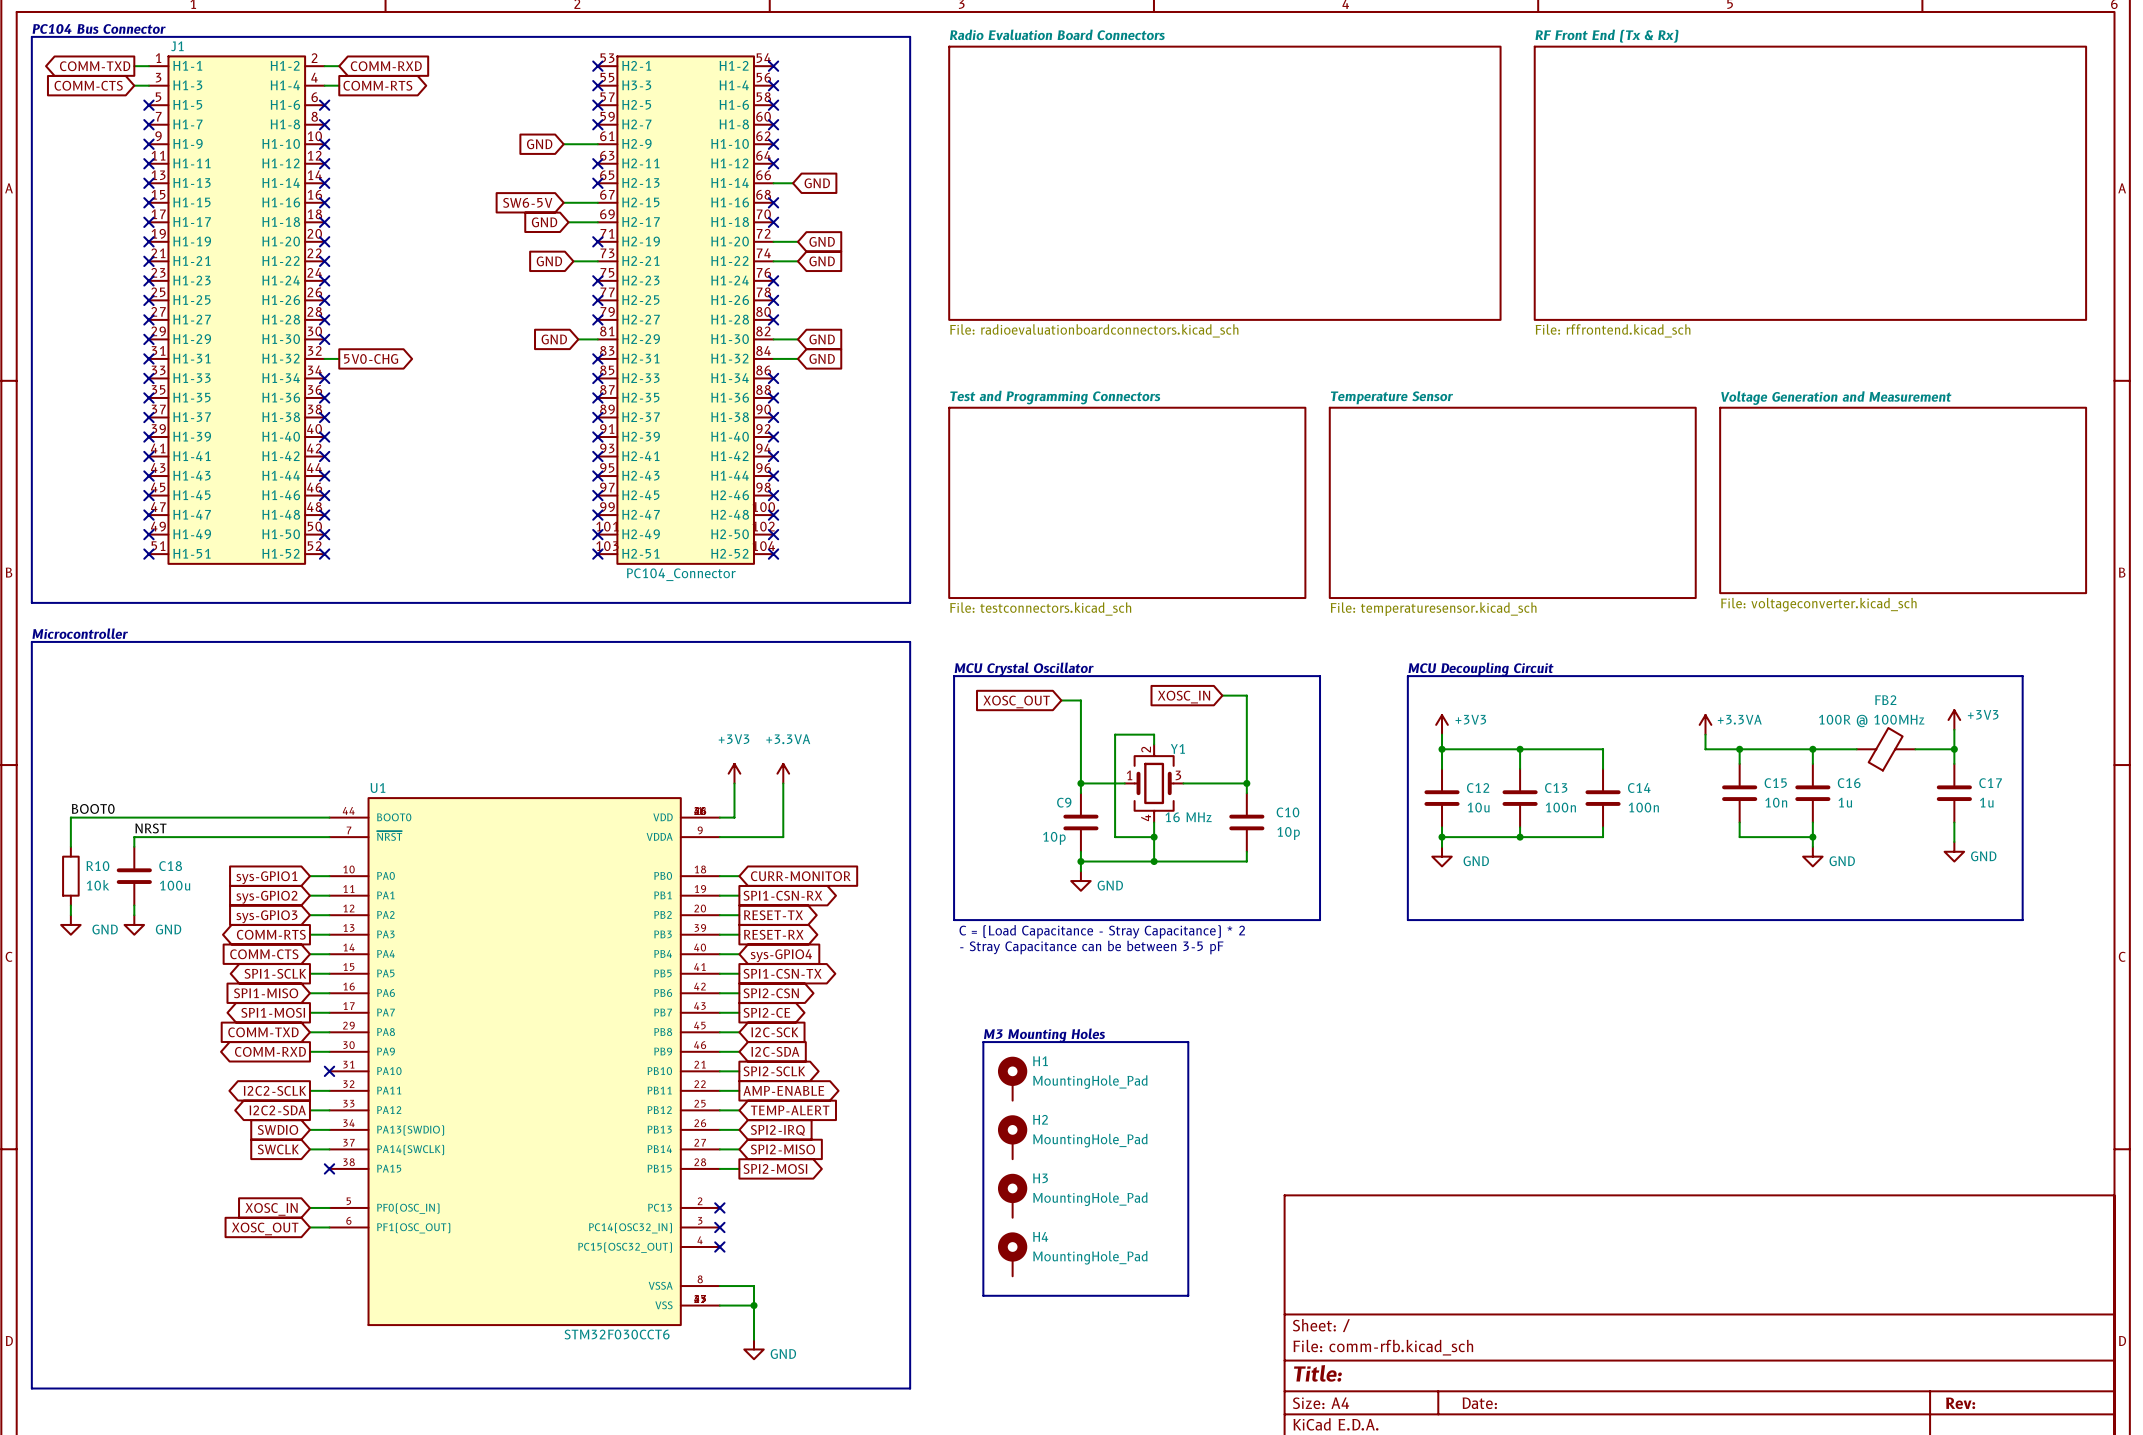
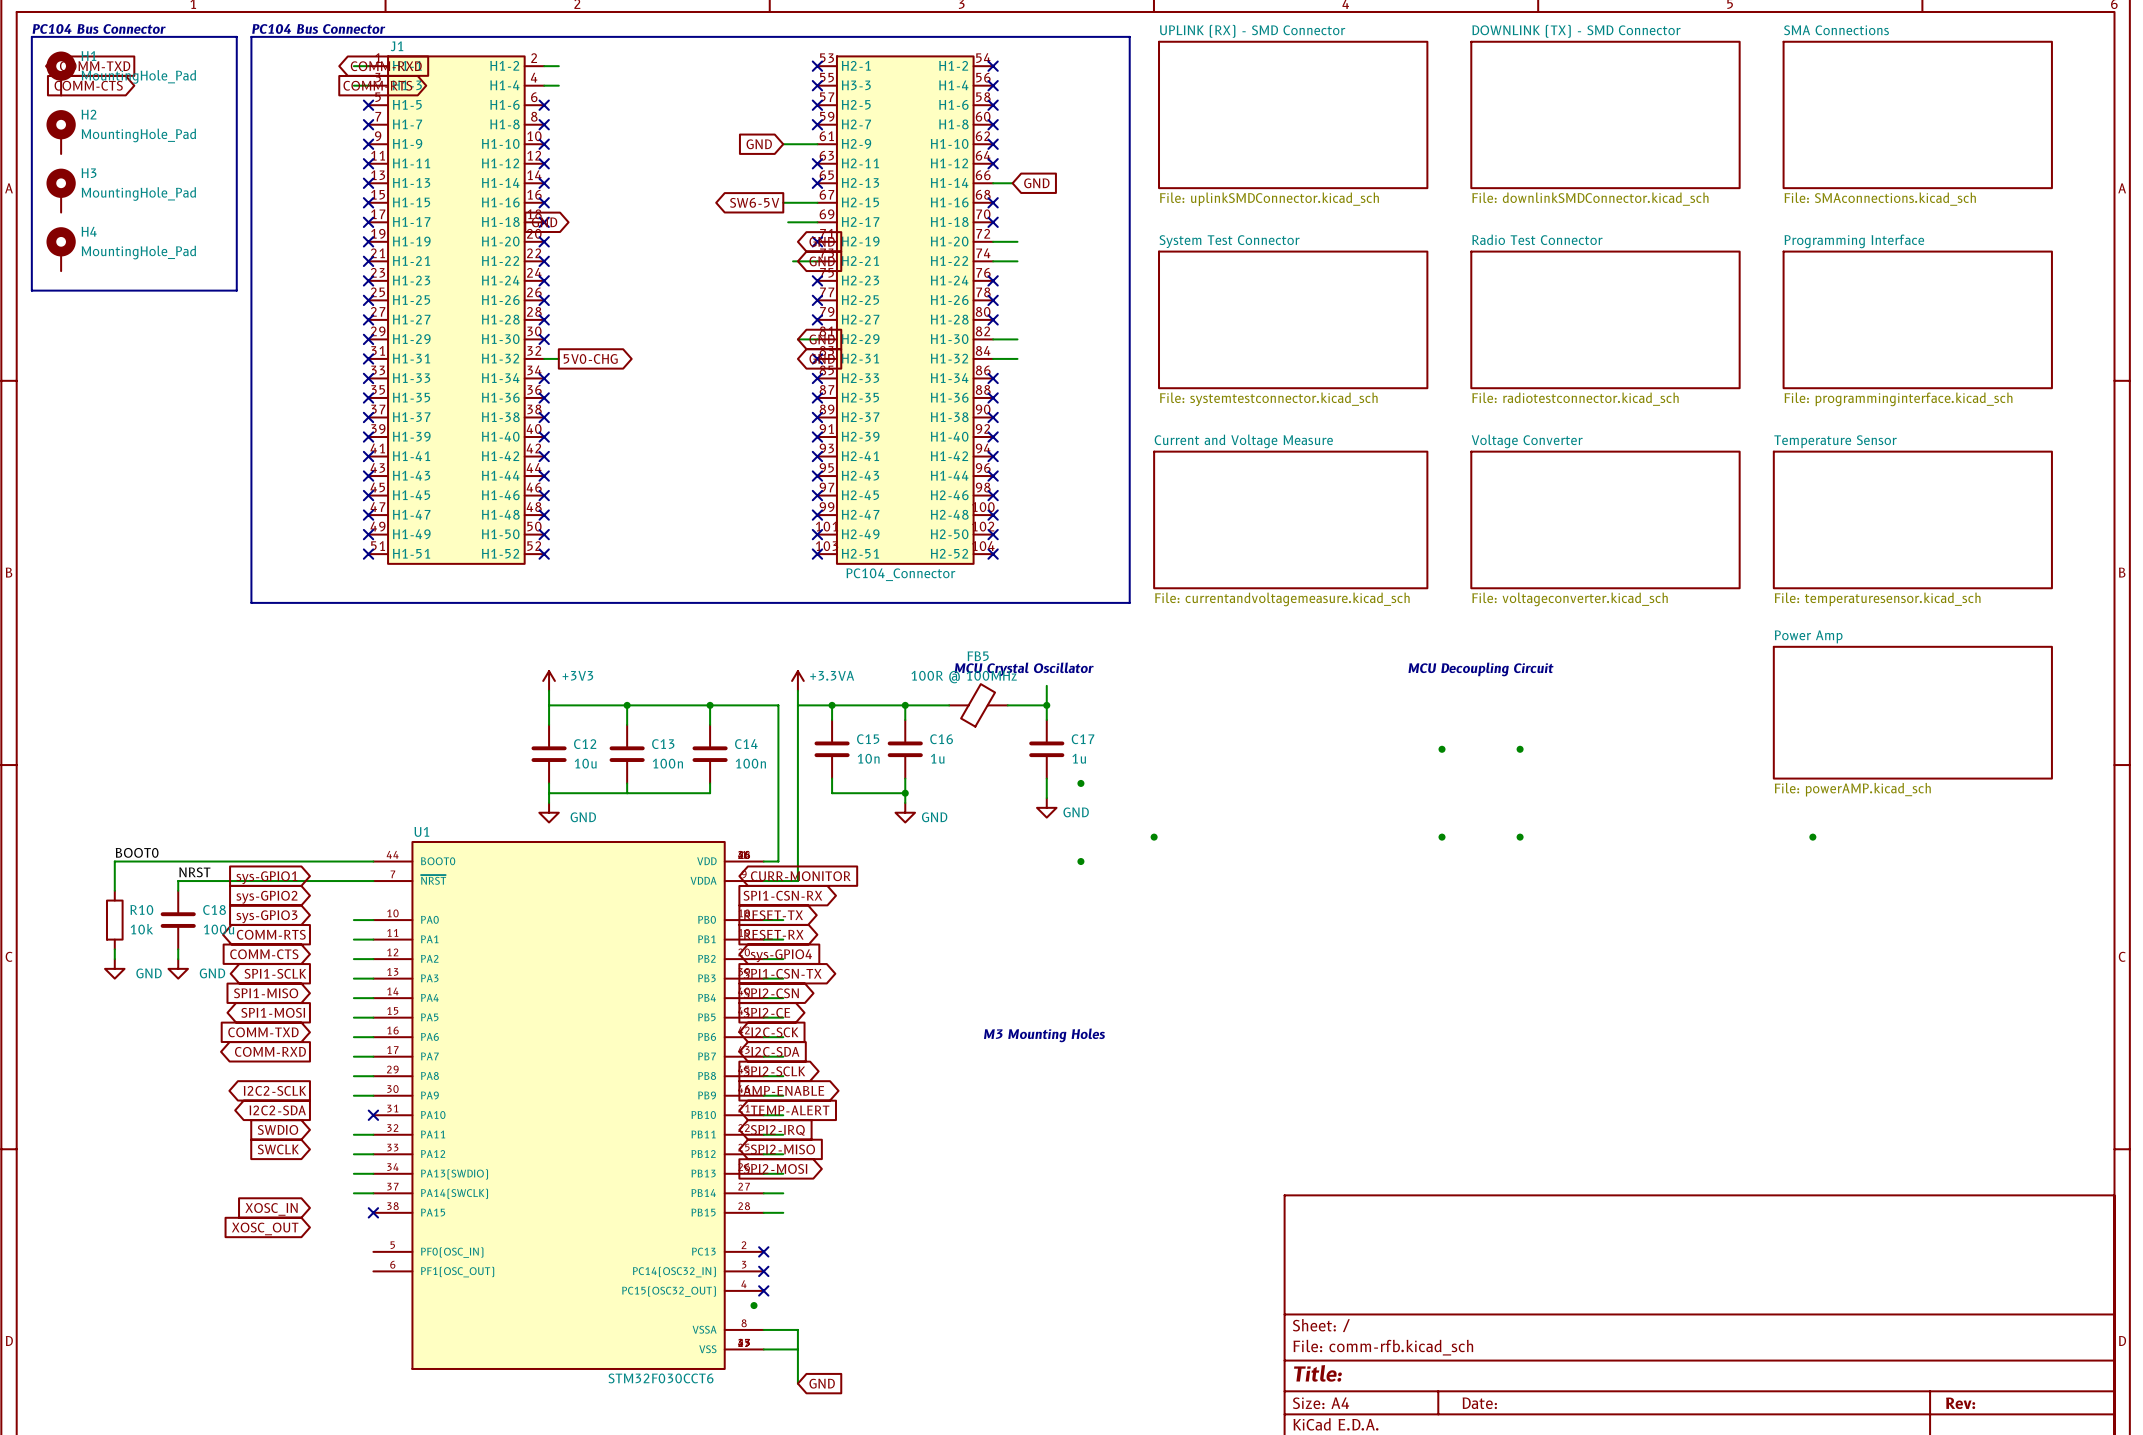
text: none -> PC104 Bus Connector (318, 28)
line: (236, 36) (251, 36) -> (236, 36) (236, 290) (31, 290)
line: (910, 36) (910, 602) -> (910, 36) (1129, 36) (1129, 602) (910, 602)
wire: (134, 66) (148, 66) -> none
wire: (324, 66) (339, 66) -> (353, 66) (368, 66)
wire: none -> (544, 66) (558, 66)
no-connect mark: (597, 66) -> none
no-connect mark: (773, 66) -> none
no-connect mark: none -> (817, 66)
no-connect mark: none -> (993, 66)
wire: (134, 85) (148, 85) -> none
wire: (324, 85) (339, 85) -> (353, 85) (368, 85)
wire: none -> (544, 85) (558, 85)
no-connect mark: (597, 85) -> none
no-connect mark: (773, 85) -> none
no-connect mark: none -> (817, 85)
no-connect mark: none -> (993, 85)
no-connect mark: (148, 105) -> none
no-connect mark: (324, 105) -> none
no-connect mark: none -> (368, 105)
no-connect mark: none -> (544, 105)
no-connect mark: (597, 105) -> none
no-connect mark: (773, 105) -> none
no-connect mark: none -> (817, 105)
no-connect mark: none -> (993, 105)
sheet UPLINK (RX) - SMD Connector: none -> File: uplinkSMDConnector.kicad_sch (1293, 114)
sheet DOWNLINK (TX) - SMD Connector: none -> File: downlinkSMDConnector.kicad_sch (1605, 114)
sheet SMA Connections: none -> File: SMAconnections.kicad_sch (1917, 114)
no-connect mark: (148, 124) -> none
no-connect mark: (324, 124) -> none
no-connect mark: none -> (368, 124)
no-connect mark: none -> (544, 124)
no-connect mark: (597, 124) -> none
no-connect mark: (773, 124) -> none
no-connect mark: none -> (817, 124)
no-connect mark: none -> (993, 124)
no-connect mark: (148, 144) -> none
no-connect mark: (324, 144) -> none
no-connect mark: none -> (368, 144)
global label: GND (539, 144) -> none
no-connect mark: none -> (544, 144)
wire: (563, 144) (597, 144) -> none
no-connect mark: (773, 144) -> none
wire: none -> (783, 144) (817, 144)
no-connect mark: none -> (993, 144)
no-connect mark: (148, 163) -> none
no-connect mark: (324, 163) -> none
no-connect mark: none -> (368, 163)
no-connect mark: none -> (544, 163)
no-connect mark: (597, 163) -> none
no-connect mark: (773, 163) -> none
no-connect mark: none -> (817, 163)
no-connect mark: none -> (993, 163)
no-connect mark: (148, 183) -> none
no-connect mark: (324, 183) -> none
no-connect mark: none -> (368, 183)
no-connect mark: none -> (544, 183)
no-connect mark: (597, 183) -> none
wire: (773, 183) (793, 183) -> (797, 261) (817, 261)
no-connect mark: none -> (817, 183)
global label rotation: 0° (817, 183) -> 180° (759, 144)
global label position: GND (817, 183) -> GND (759, 144)
wire: none -> (993, 183) (1012, 183)
global label: none -> GND (1036, 183)
sheet Radio Evaluation Board Connectors: File: radioevaluationboardconnectors.kicad_sch (1224, 183) -> none
sheet RF Front End (Tx & Rx): File: rffrontend.kicad_sch (1810, 183) -> none
no-connect mark: (148, 202) -> none
no-connect mark: (324, 202) -> none
no-connect mark: none -> (368, 202)
global label: SW6-5V (527, 202) -> none
no-connect mark: none -> (544, 202)
wire: (563, 202) (597, 202) -> none
global label: none -> SW6-5V (754, 202)
no-connect mark: (773, 202) -> none
wire: none -> (783, 202) (817, 202)
no-connect mark: none -> (993, 202)
no-connect mark: (148, 222) -> none
no-connect mark: (324, 222) -> none
no-connect mark: none -> (368, 222)
no-connect mark: none -> (544, 222)
wire: (568, 222) (597, 222) -> none
no-connect mark: (773, 222) -> none
wire: none -> (788, 222) (817, 222)
no-connect mark: none -> (993, 222)
no-connect mark: (148, 241) -> none
no-connect mark: (324, 241) -> none
no-connect mark: none -> (368, 241)
no-connect mark: none -> (544, 241)
no-connect mark: (597, 241) -> none
wire: (773, 241) (797, 241) -> none
no-connect mark: none -> (817, 241)
wire: none -> (993, 241) (1017, 241)
no-connect mark: (148, 261) -> none
no-connect mark: (324, 261) -> none
no-connect mark: none -> (368, 261)
no-connect mark: none -> (544, 261)
global label: GND (549, 261) -> none
wire: (573, 261) (597, 261) -> none
wire: (773, 261) (793, 261) -> none
wire: none -> (993, 261) (1017, 261)
no-connect mark: (148, 280) -> none
no-connect mark: (324, 280) -> none
no-connect mark: none -> (368, 280)
no-connect mark: none -> (544, 280)
no-connect mark: (597, 280) -> none
no-connect mark: (773, 280) -> none
no-connect mark: none -> (817, 280)
no-connect mark: none -> (993, 280)
line: (31, 290) (31, 602) (251, 602) -> (251, 36) (251, 602)
no-connect mark: (148, 300) -> none
no-connect mark: (324, 300) -> none
no-connect mark: none -> (368, 300)
no-connect mark: none -> (544, 300)
no-connect mark: (597, 300) -> none
no-connect mark: (773, 300) -> none
no-connect mark: none -> (817, 300)
no-connect mark: none -> (993, 300)
J1 position: (461, 310) -> (680, 310)
no-connect mark: (148, 319) -> none
no-connect mark: (324, 319) -> none
no-connect mark: none -> (368, 319)
no-connect mark: none -> (544, 319)
no-connect mark: (597, 319) -> none
no-connect mark: (773, 319) -> none
no-connect mark: none -> (817, 319)
no-connect mark: none -> (993, 319)
sheet System Test Connector: none -> File: systemtestconnector.kicad_sch (1293, 319)
sheet Radio Test Connector: none -> File: radiotestconnector.kicad_sch (1605, 319)
sheet Programming Interface: none -> File: programminginterface.kicad_sch (1917, 319)
no-connect mark: (148, 339) -> none
no-connect mark: (324, 339) -> none
no-connect mark: none -> (368, 339)
no-connect mark: none -> (544, 339)
global label: GND (554, 339) -> none
wire: (578, 339) (597, 339) -> none
wire: (773, 339) (797, 339) -> (817, 339) (797, 339)
wire: none -> (993, 339) (1017, 339)
no-connect mark: (148, 358) -> none
wire: (324, 358) (339, 358) -> none
no-connect mark: none -> (368, 358)
global label: 5V0-CHG (371, 358) -> none
wire: none -> (544, 358) (558, 358)
global label: none -> 5V0-CHG (590, 358)
no-connect mark: (597, 358) -> none
wire: (773, 358) (797, 358) -> none
no-connect mark: none -> (817, 358)
wire: none -> (993, 358) (1017, 358)
no-connect mark: (148, 378) -> none
no-connect mark: (324, 378) -> none
no-connect mark: none -> (368, 378)
no-connect mark: none -> (544, 378)
no-connect mark: (597, 378) -> none
no-connect mark: (773, 378) -> none
no-connect mark: none -> (817, 378)
no-connect mark: none -> (993, 378)
no-connect mark: (148, 397) -> none
no-connect mark: (324, 397) -> none
no-connect mark: none -> (368, 397)
no-connect mark: none -> (544, 397)
no-connect mark: (597, 397) -> none
no-connect mark: (773, 397) -> none
no-connect mark: none -> (817, 397)
no-connect mark: none -> (993, 397)
no-connect mark: (148, 417) -> none
no-connect mark: (324, 417) -> none
no-connect mark: none -> (368, 417)
no-connect mark: none -> (544, 417)
no-connect mark: (597, 417) -> none
no-connect mark: (773, 417) -> none
no-connect mark: none -> (817, 417)
no-connect mark: none -> (993, 417)
no-connect mark: (148, 437) -> none
no-connect mark: (324, 437) -> none
no-connect mark: none -> (368, 437)
no-connect mark: none -> (544, 437)
no-connect mark: (597, 437) -> none
no-connect mark: (773, 437) -> none
no-connect mark: none -> (817, 437)
no-connect mark: none -> (993, 437)
no-connect mark: (148, 456) -> none
no-connect mark: (324, 456) -> none
no-connect mark: none -> (368, 456)
no-connect mark: none -> (544, 456)
no-connect mark: (597, 456) -> none
no-connect mark: (773, 456) -> none
no-connect mark: none -> (817, 456)
no-connect mark: none -> (993, 456)
no-connect mark: (148, 476) -> none
no-connect mark: (324, 476) -> none
no-connect mark: none -> (368, 476)
no-connect mark: none -> (544, 476)
no-connect mark: (597, 476) -> none
no-connect mark: (773, 476) -> none
no-connect mark: none -> (817, 476)
no-connect mark: none -> (993, 476)
no-connect mark: (148, 495) -> none
no-connect mark: (324, 495) -> none
no-connect mark: none -> (368, 495)
no-connect mark: none -> (544, 495)
no-connect mark: (597, 495) -> none
no-connect mark: (773, 495) -> none
no-connect mark: none -> (817, 495)
no-connect mark: none -> (993, 495)
sheet Voltage Generation and Measurement: File: voltageconverter.kicad_sch (1903, 500) -> none
sheet Test and Programming Connectors: File: testconnectors.kicad_sch (1127, 502) -> none
sheet Temperature Sensor: File: temperaturesensor.kicad_sch (1512, 502) -> none
no-connect mark: (148, 515) -> none
no-connect mark: (324, 515) -> none
no-connect mark: none -> (368, 515)
no-connect mark: none -> (544, 515)
no-connect mark: (597, 515) -> none
no-connect mark: (773, 515) -> none
no-connect mark: none -> (817, 515)
no-connect mark: none -> (993, 515)
sheet Current and Voltage Measure: none -> File: currentandvoltagemeasure.kicad_sch (1290, 519)
sheet Voltage Converter: none -> File: voltageconverter.kicad_sch (1605, 519)
sheet Temperature Sensor: none -> File: temperaturesensor.kicad_sch (1912, 519)
no-connect mark: (148, 534) -> none
no-connect mark: (324, 534) -> none
no-connect mark: none -> (368, 534)
no-connect mark: none -> (544, 534)
no-connect mark: (597, 534) -> none
no-connect mark: (773, 534) -> none
no-connect mark: none -> (817, 534)
no-connect mark: none -> (993, 534)
no-connect mark: (148, 554) -> none
no-connect mark: (324, 554) -> none
no-connect mark: none -> (368, 554)
no-connect mark: none -> (544, 554)
no-connect mark: (597, 554) -> none
no-connect mark: (773, 554) -> none
no-connect mark: none -> (817, 554)
no-connect mark: none -> (993, 554)
text: Microcontroller (80, 633) -> none
line: (31, 641) (31, 1388) (910, 1388) (910, 641) (31, 641) -> none
line: (954, 676) (1320, 676) (1320, 920) (954, 920) (954, 676) -> none
line: (1407, 676) (1407, 920) (2022, 920) (2022, 676) (1407, 676) -> none
power symbol: none -> +3V3 (549, 680)
wire: none -> (1046, 685) (1046, 720)
wire: none -> (549, 690) (549, 724)
wire: none -> (797, 690) (797, 881) (763, 881)
wire: (1222, 695) (1246, 695) (1246, 793) -> none
global label: XOSC_IN (1184, 697) -> none
wire: (1061, 700) (1080, 700) (1080, 793) -> none
global label: XOSC_OUT (1016, 701) -> none
wire: none -> (549, 705) (778, 705) (778, 861) (763, 861)
wire: none -> (627, 705) (627, 724)
junction: none -> (627, 705)
wire: none -> (710, 705) (710, 724)
junction: none -> (710, 705)
wire: none -> (797, 705) (949, 705)
wire: none -> (832, 705) (832, 720)
junction: none -> (832, 705)
wire: none -> (905, 705) (905, 720)
junction: none -> (905, 705)
FB5: none -> 100R @ 100MHz (978, 705)
wire: none -> (1007, 705) (1046, 705)
junction: none -> (1046, 705)
sheet Power Amp: none -> File: powerAMP.kicad_sch (1912, 712)
power symbol: +3V3 (1954, 720) -> none
power symbol: +3V3 (1442, 724) -> none
power symbol: +3.3VA (1705, 724) -> none
wire: (1954, 729) (1954, 763) -> none
wire: (1442, 734) (1442, 768) -> none
wire: (1705, 734) (1705, 749) (1856, 749) -> none
power symbol text position: +3.3VA (788, 739) -> +3.3VA (832, 675)
wire: (1154, 744) (1154, 734) (1115, 734) (1115, 837) (1154, 837) -> none
wire: (1442, 749) (1603, 749) (1603, 768) -> none
wire: (1520, 749) (1520, 768) -> none
wire: (1739, 749) (1739, 763) -> none
junction: (1739, 749) -> none
wire: (1812, 749) (1812, 763) -> none
junction: (1812, 749) -> none
FB2: 100R @ 100MHz (1886, 749) -> none
wire: (1915, 749) (1954, 749) -> none
junction: (1954, 749) -> none
power symbol: +3V3 (734, 773) -> none
power symbol position: +3.3VA (783, 773) -> +3.3VA (797, 680)
wire: none -> (832, 778) (832, 793) (905, 793)
wire: none -> (905, 778) (905, 802)
wire: none -> (549, 783) (549, 802)
wire: none -> (627, 783) (627, 793)
wire: none -> (710, 783) (710, 793) (549, 793)
wire: (734, 783) (734, 817) (719, 817) -> none
wire: (783, 783) (783, 837) (719, 837) -> none
wire: (1080, 783) (1124, 783) -> none
Y1: 16 MHz (1154, 783) -> none
wire: (1183, 783) (1246, 783) -> none
junction: (1246, 783) -> none
junction: none -> (905, 793)
C15 position: (1739, 793) -> (832, 749)
C16 position: (1812, 793) -> (905, 749)
C17 position: (1954, 793) -> (1046, 749)
C12 position: (1442, 798) -> (549, 754)
C13 position: (1520, 798) -> (627, 754)
C14 position: (1603, 798) -> (710, 754)
label position: BOOT0 (93, 808) -> BOOT0 (137, 852)
power symbol: none -> GND (549, 812)
power symbol: none -> GND (905, 812)
wire: (329, 817) (70, 817) (70, 846) -> (373, 861) (114, 861) (114, 890)
C9: 10p (1080, 822) -> none
wire: (1154, 822) (1154, 861) -> none
C10: 10p (1246, 822) -> none
wire: (1739, 822) (1739, 837) (1812, 837) -> none
wire: (1812, 822) (1812, 846) -> none
wire: (1954, 822) (1954, 842) -> none
wire: (1442, 827) (1442, 846) -> none
wire: (1520, 827) (1520, 837) -> none
wire: (1603, 827) (1603, 837) (1442, 837) -> none
label position: NRST (150, 828) -> NRST (194, 872)
wire: (329, 837) (134, 837) (134, 846) -> (373, 881) (178, 881) (178, 890)
wire: (1080, 851) (1080, 871) -> (1046, 778) (1046, 798)
wire: (1246, 851) (1246, 861) (1080, 861) -> none
power symbol: GND (1954, 851) -> none
power symbol: GND (1442, 856) -> none
power symbol: GND (1812, 856) -> none
junction: (1154, 861) -> none
R10 position: (70, 876) -> (114, 920)
C18 position: (134, 876) -> (178, 920)
wire: (309, 876) (329, 876) -> (353, 920) (373, 920)
wire: (719, 876) (739, 876) -> (763, 920) (783, 920)
power symbol position: GND (1080, 881) -> GND (1046, 807)
wire: (309, 895) (329, 895) -> (353, 939) (373, 939)
wire: (719, 895) (739, 895) -> (763, 939) (783, 939)
wire: (70, 905) (70, 915) -> (114, 949) (114, 959)
wire: (134, 905) (134, 915) -> (178, 949) (178, 959)
wire: (309, 915) (329, 915) -> (353, 959) (373, 959)
wire: (719, 915) (739, 915) -> (763, 959) (783, 959)
power symbol: GND (70, 924) -> none
power symbol: GND (134, 924) -> none
text: C = (Load Capacitance - Stray Capacitance) * 2 (1102, 931) -> none
wire: (309, 934) (329, 934) -> (353, 978) (373, 978)
wire: (719, 934) (739, 934) -> (763, 978) (783, 978)
text: - Stray Capacitance can be between 3-5 pF (1091, 947) -> none
wire: (309, 954) (329, 954) -> (353, 998) (373, 998)
wire: (719, 954) (739, 954) -> (763, 998) (783, 998)
power symbol: none -> GND (114, 968)
power symbol: none -> GND (178, 968)
wire: (309, 973) (329, 973) -> (353, 1017) (373, 1017)
wire: (719, 973) (739, 973) -> (763, 1017) (783, 1017)
wire: (309, 993) (329, 993) -> (353, 1037) (373, 1037)
wire: (719, 993) (739, 993) -> (763, 1037) (783, 1037)
wire: (309, 1012) (329, 1012) -> (353, 1056) (373, 1056)
wire: (719, 1012) (739, 1012) -> (763, 1056) (783, 1056)
wire: (309, 1032) (329, 1032) -> (353, 1076) (373, 1076)
wire: (719, 1032) (739, 1032) -> (763, 1076) (783, 1076)
line: (983, 1042) (983, 1295) (1188, 1295) (1188, 1042) (983, 1042) -> none
wire: (309, 1051) (329, 1051) -> (353, 1095) (373, 1095)
wire: (719, 1051) (739, 1051) -> (763, 1095) (783, 1095)
U1 position: (524, 1061) -> (568, 1105)
no-connect mark: (329, 1071) -> none
wire: (719, 1071) (739, 1071) -> (763, 1115) (783, 1115)
H1 position: (1012, 1078) -> (61, 73)
wire: (309, 1090) (329, 1090) -> (353, 1134) (373, 1134)
wire: (719, 1090) (739, 1090) -> (763, 1134) (783, 1134)
wire: (309, 1110) (329, 1110) -> (353, 1154) (373, 1154)
wire: (719, 1110) (739, 1110) -> (763, 1154) (783, 1154)
no-connect mark: none -> (373, 1115)
wire: (309, 1129) (329, 1129) -> (353, 1173) (373, 1173)
wire: (719, 1129) (739, 1129) -> (763, 1173) (783, 1173)
H2 position: (1012, 1137) -> (61, 132)
wire: (309, 1149) (329, 1149) -> (353, 1193) (373, 1193)
wire: (719, 1149) (739, 1149) -> (763, 1193) (783, 1193)
no-connect mark: (329, 1168) -> none
wire: (719, 1168) (739, 1168) -> (763, 1212) (783, 1212)
H3 position: (1012, 1195) -> (61, 190)
wire: (309, 1207) (329, 1207) -> none
no-connect mark: (719, 1207) -> none
no-connect mark: none -> (373, 1212)
wire: (309, 1227) (329, 1227) -> none
no-connect mark: (719, 1227) -> none
no-connect mark: (719, 1247) -> none
no-connect mark: none -> (763, 1251)
H4 position: (1012, 1254) -> (61, 249)
no-connect mark: none -> (763, 1271)
wire: (719, 1286) (754, 1286) (754, 1339) -> (763, 1329) (797, 1329) (797, 1383)
no-connect mark: none -> (763, 1290)
wire: (719, 1305) (754, 1305) -> (763, 1349) (797, 1349)
power symbol: GND (754, 1349) -> none
global label: none -> GND (822, 1383)

